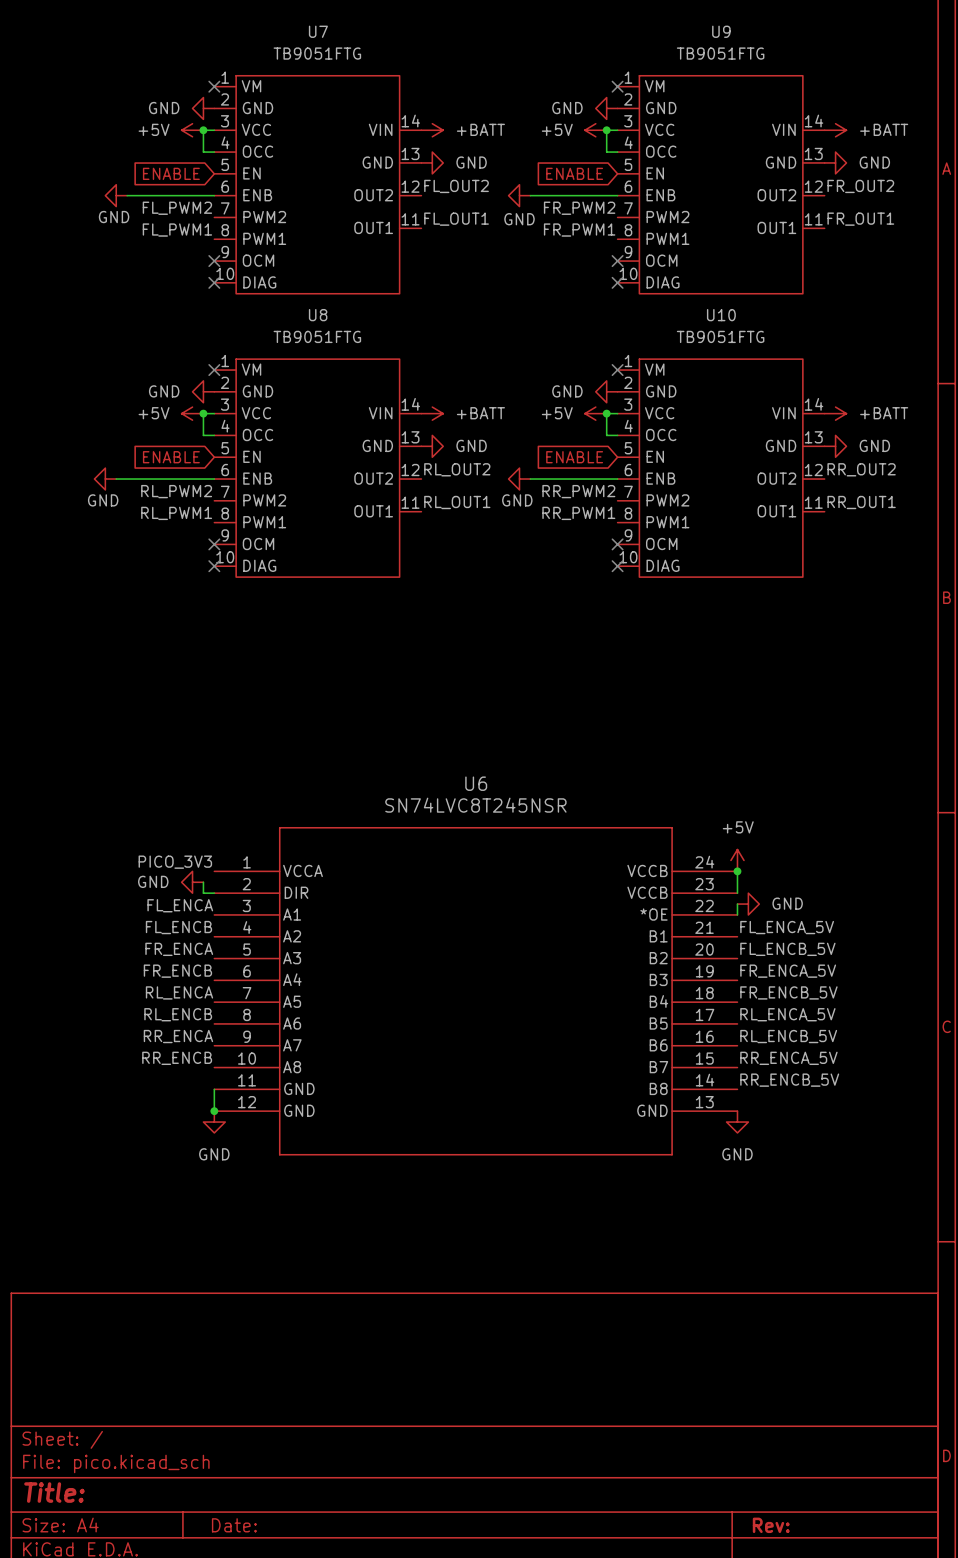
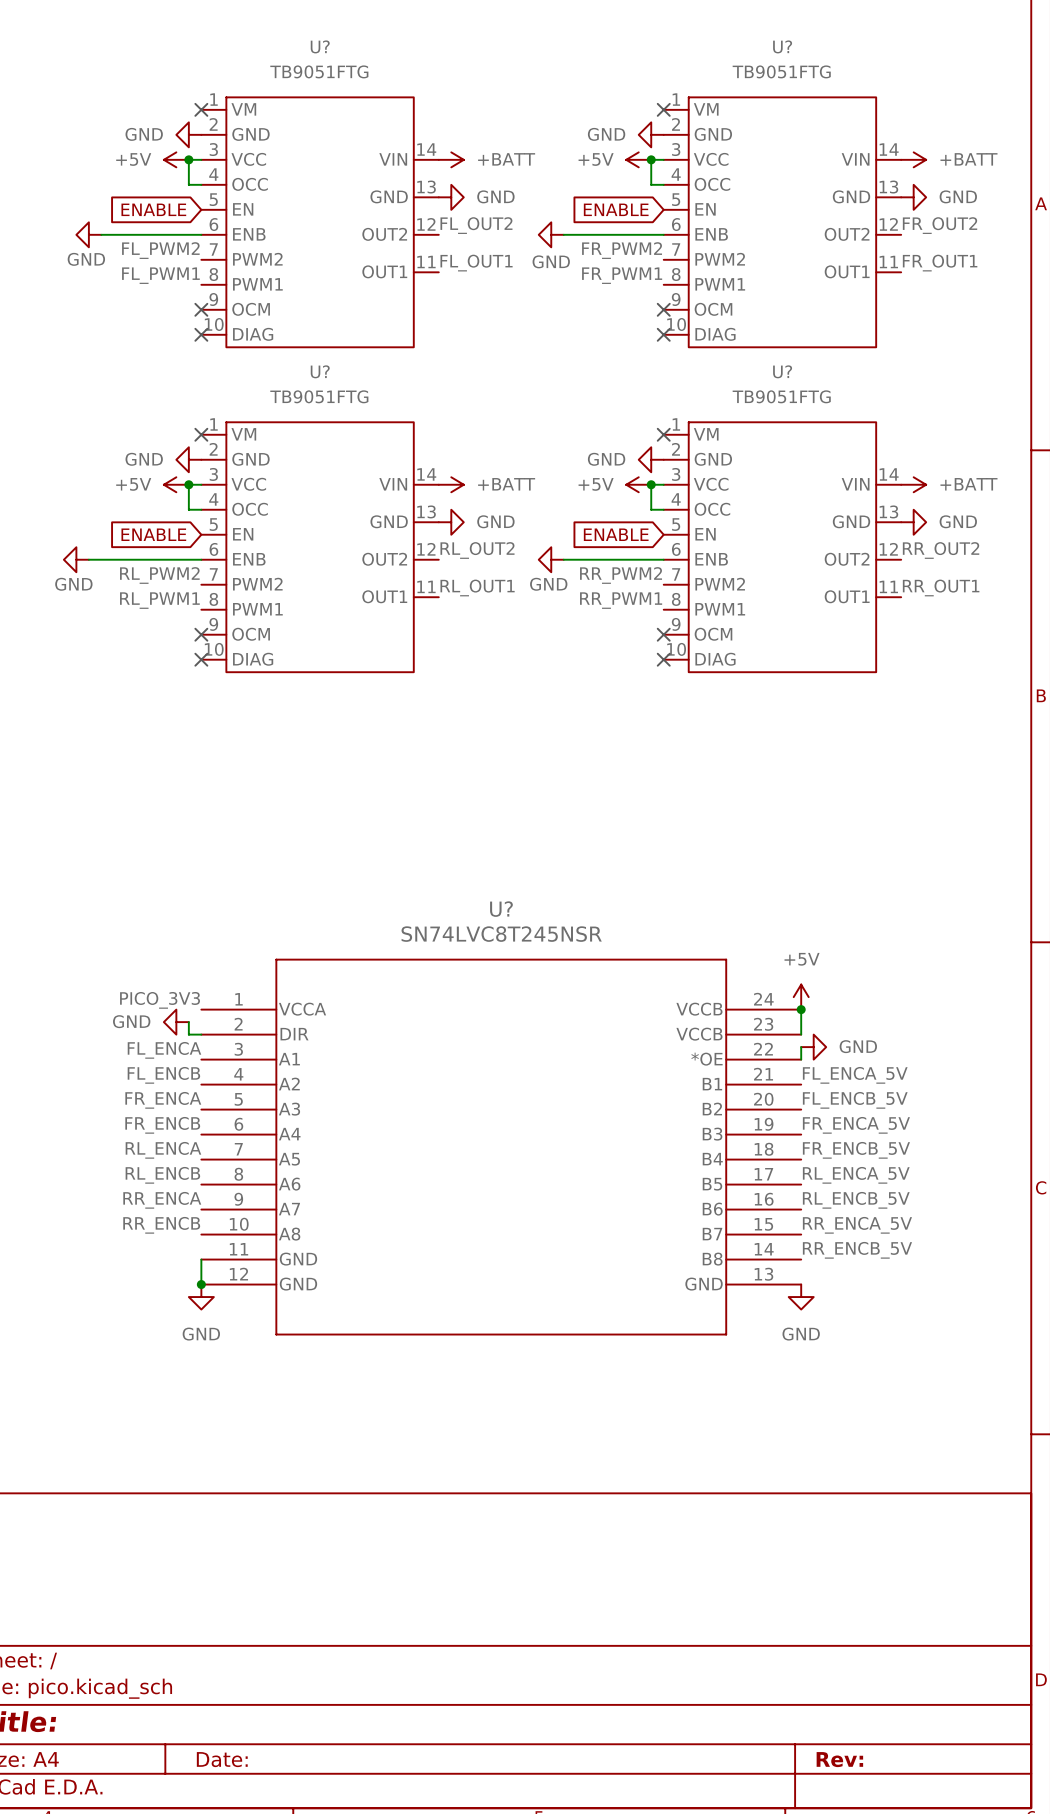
U7 name: U7 (318, 31) -> U? (320, 46)
U9 name: U9 (721, 31) -> U? (782, 46)
U8 name: U8 (318, 315) -> U? (320, 371)
U10 name: U10 (721, 315) -> U? (782, 371)
U6 name: U6 (476, 783) -> U? (501, 909)

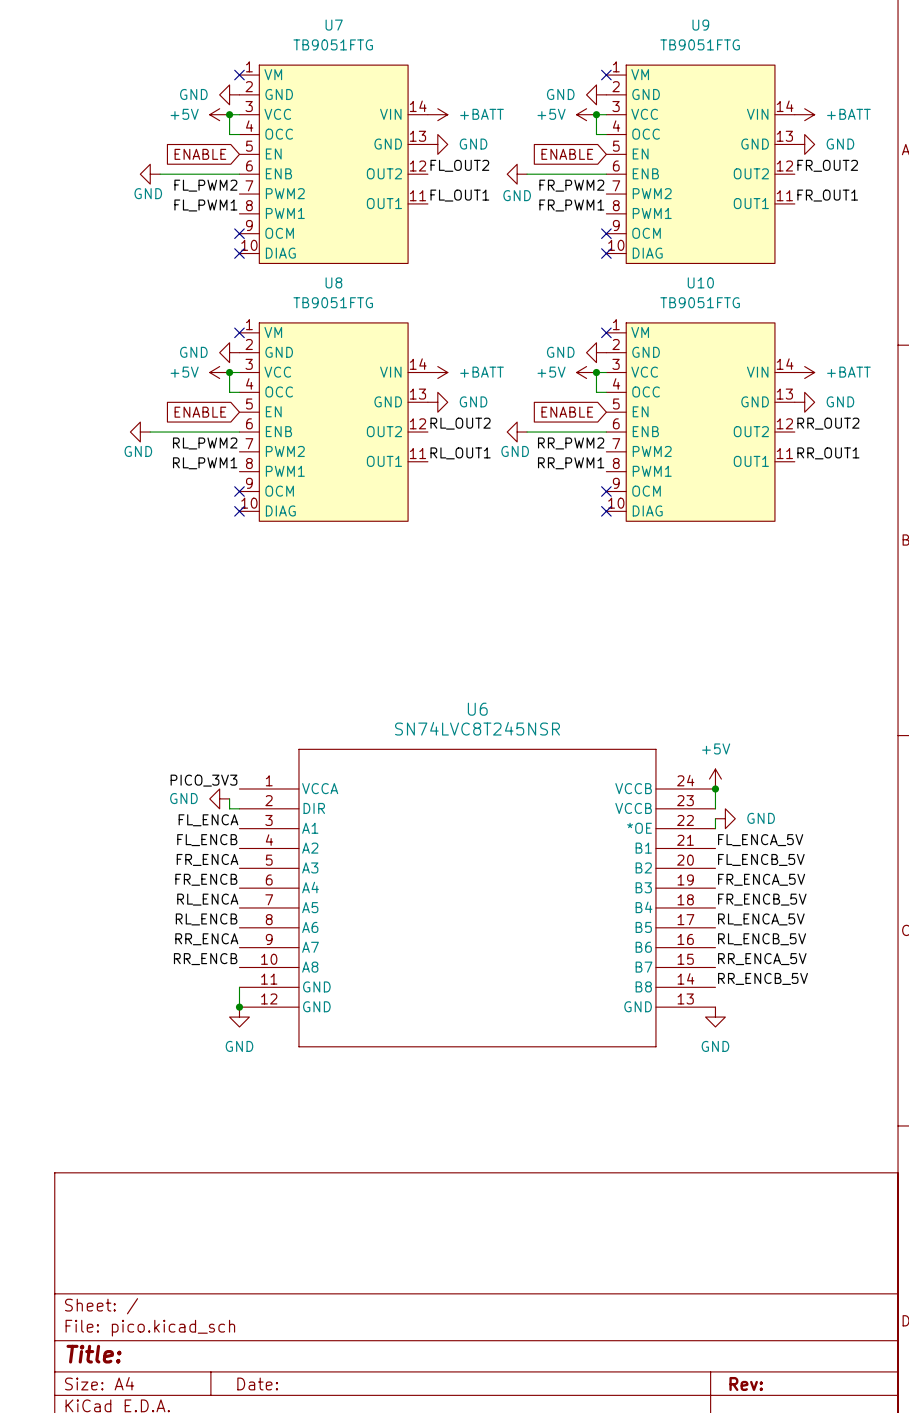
U? name: U? (320, 46) -> U7 (334, 25)
U? name: U? (782, 46) -> U9 (700, 25)
U? name: U? (320, 371) -> U8 (333, 282)
U? name: U? (782, 371) -> U10 (700, 282)
U? name: U? (501, 909) -> U6 (477, 709)

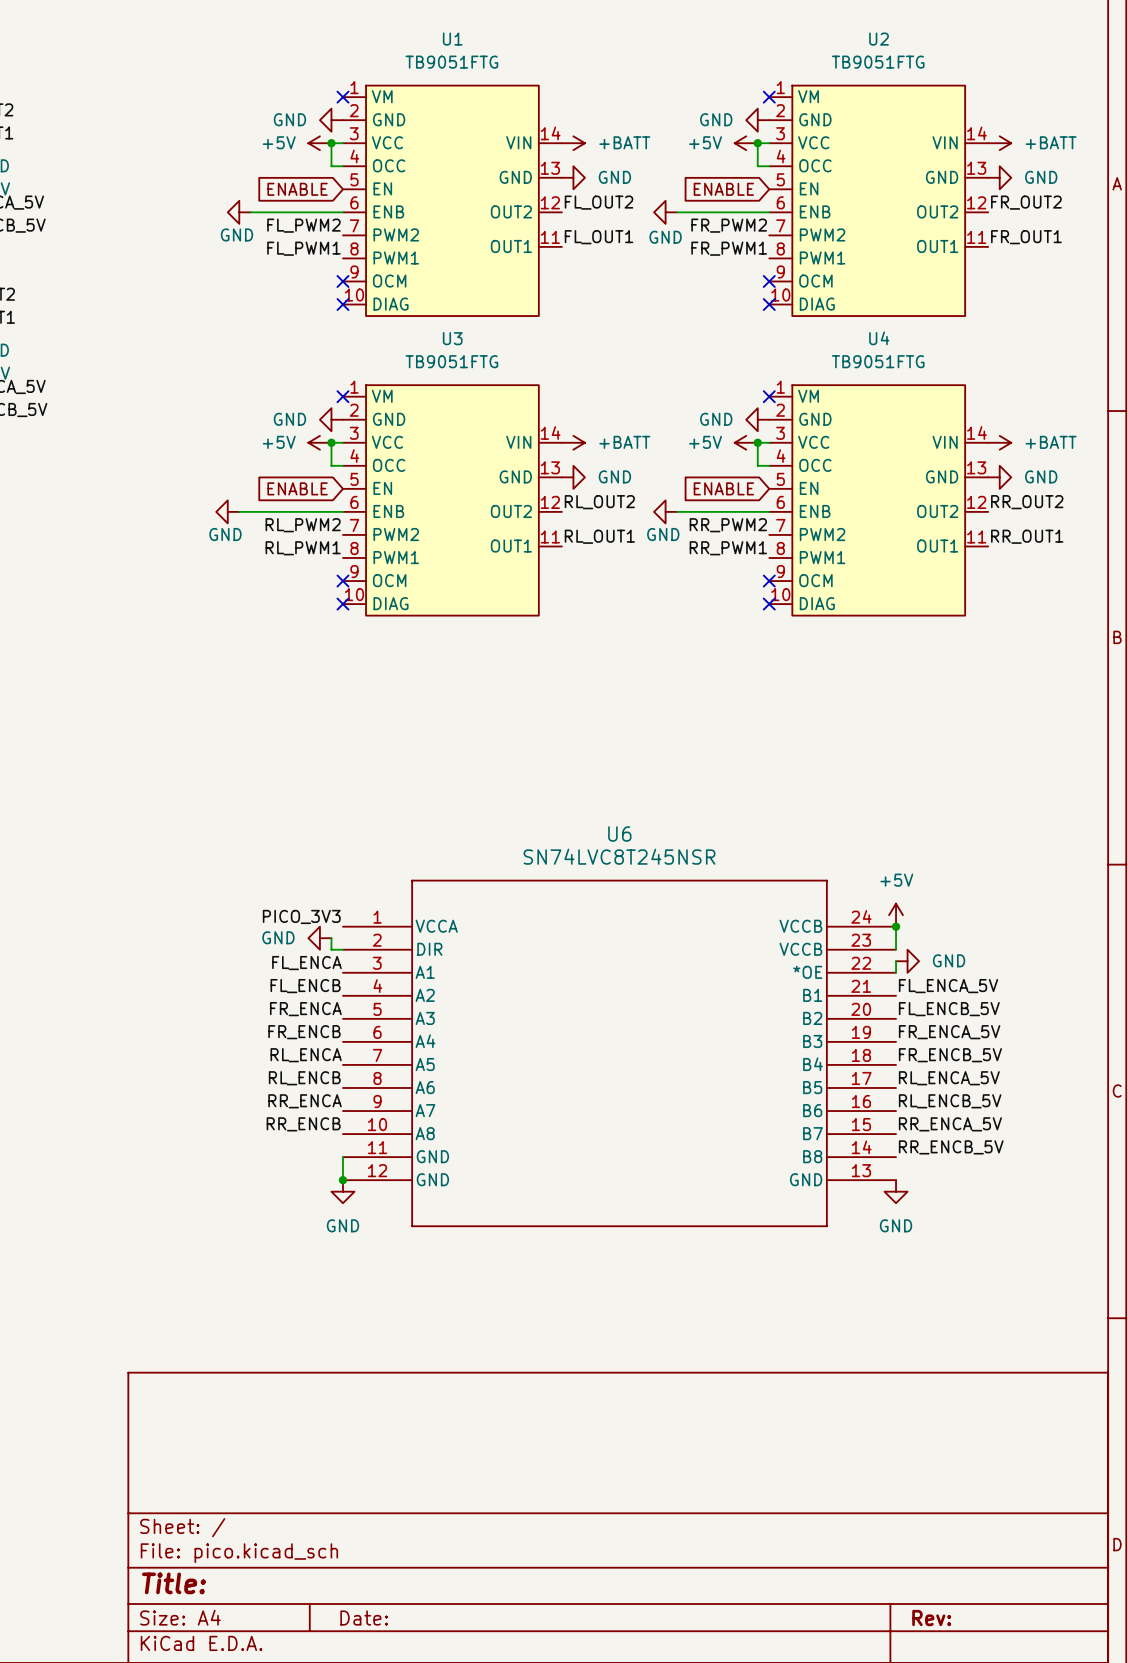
U7 name: U7 (334, 25) -> U1 (452, 39)
U9 name: U9 (700, 25) -> U2 (879, 39)
U8 name: U8 (333, 282) -> U3 (452, 338)
U10 name: U10 (700, 282) -> U4 (879, 338)

